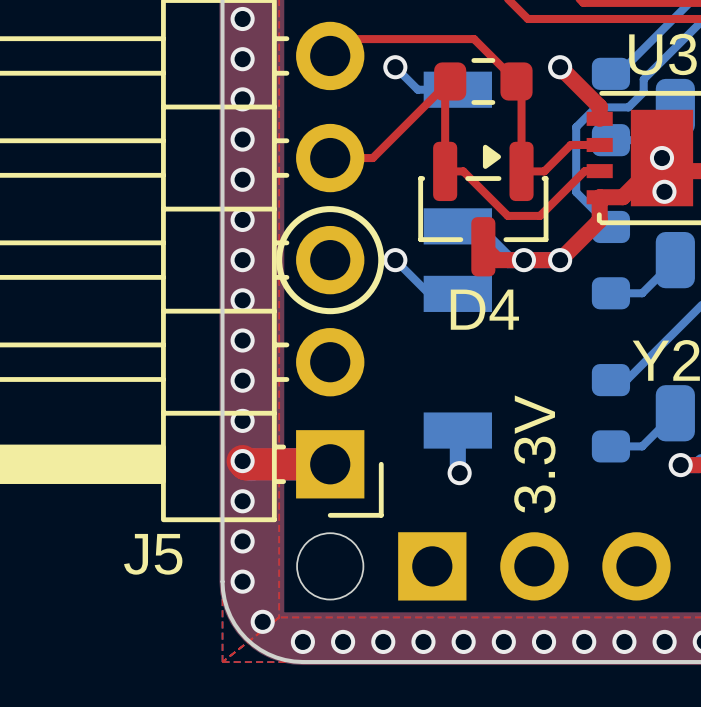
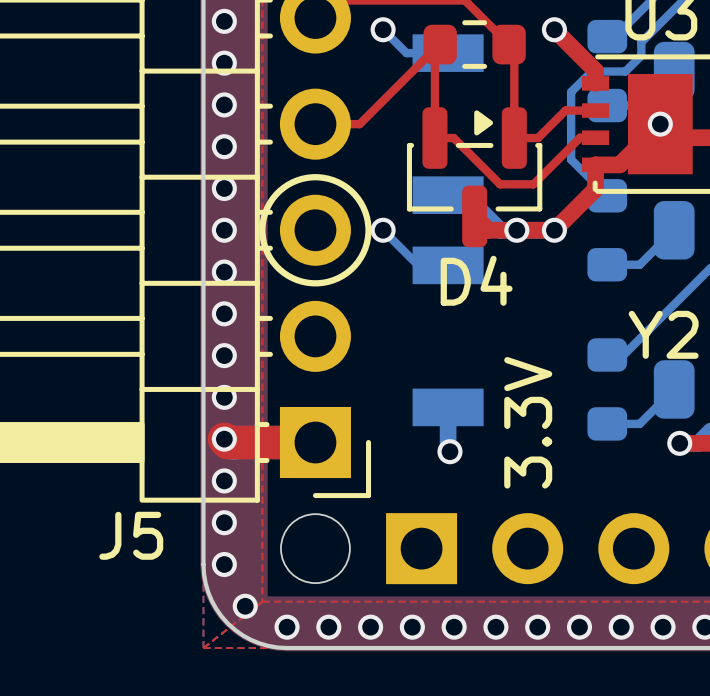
via: (664, 191) -> none

